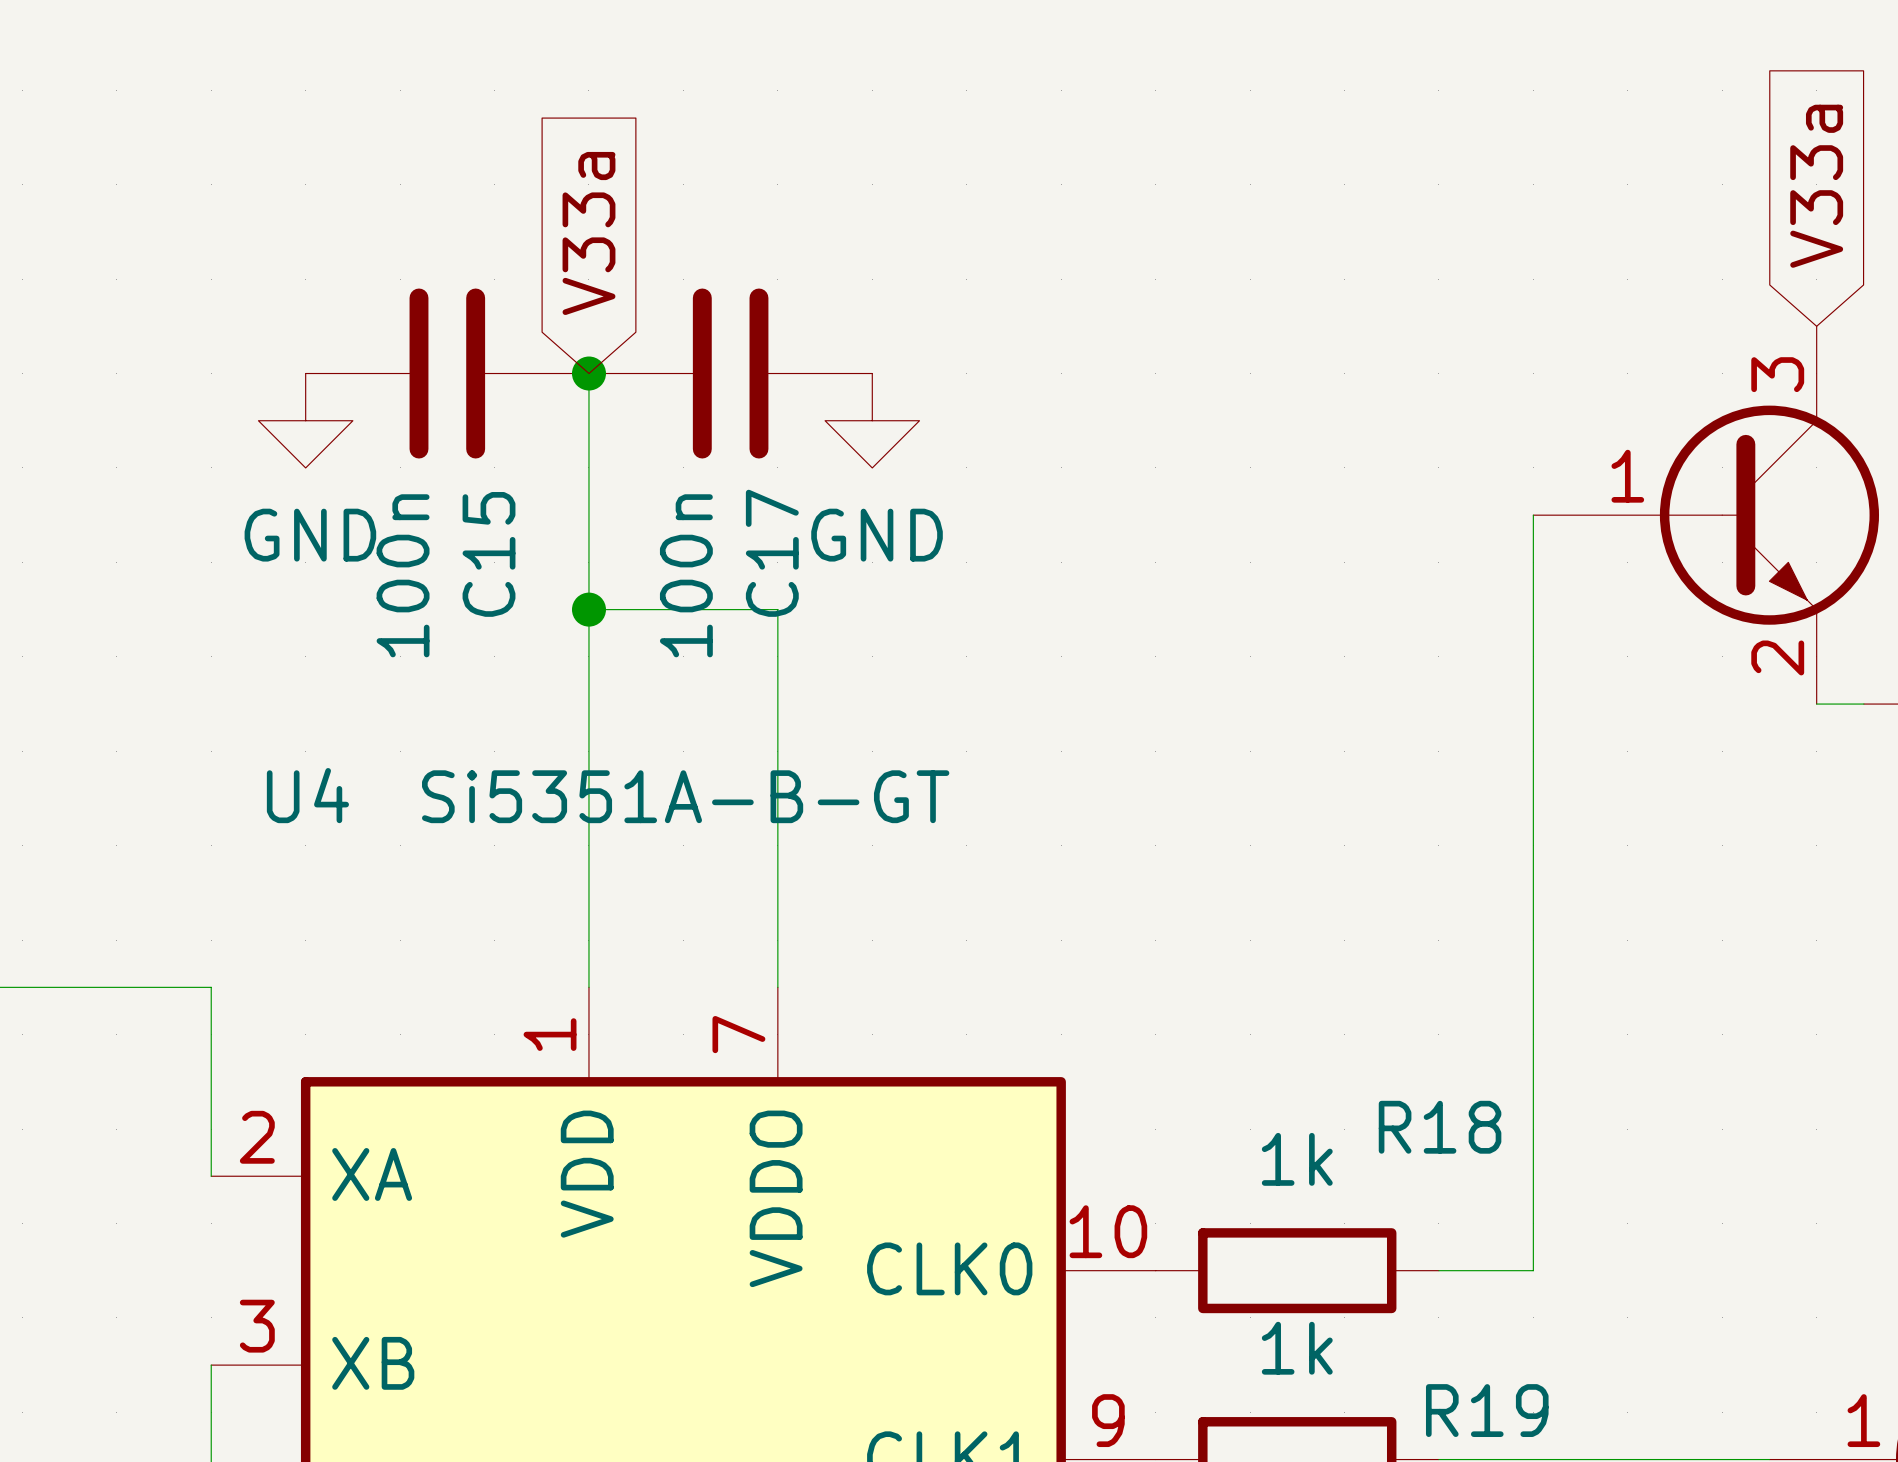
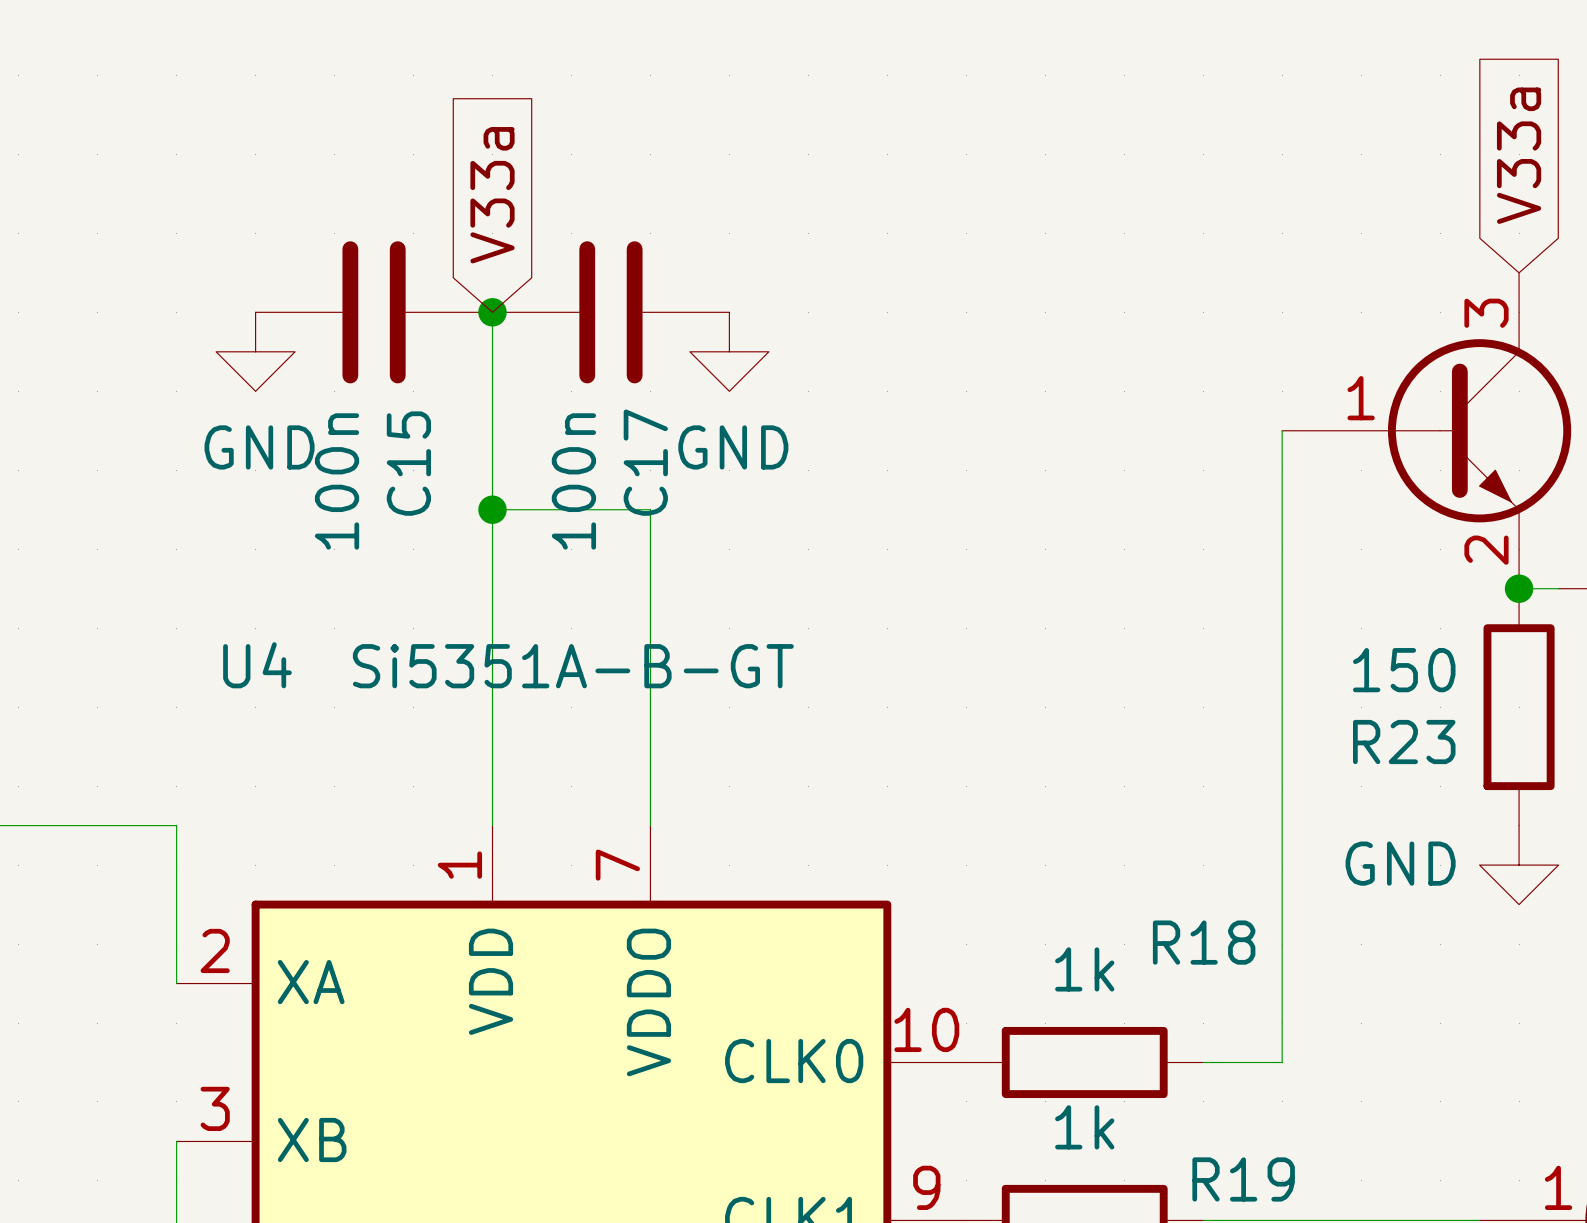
junction: none -> (1519, 588)
R23: none -> 150 (1519, 707)
power symbol: none -> GND (1519, 865)

